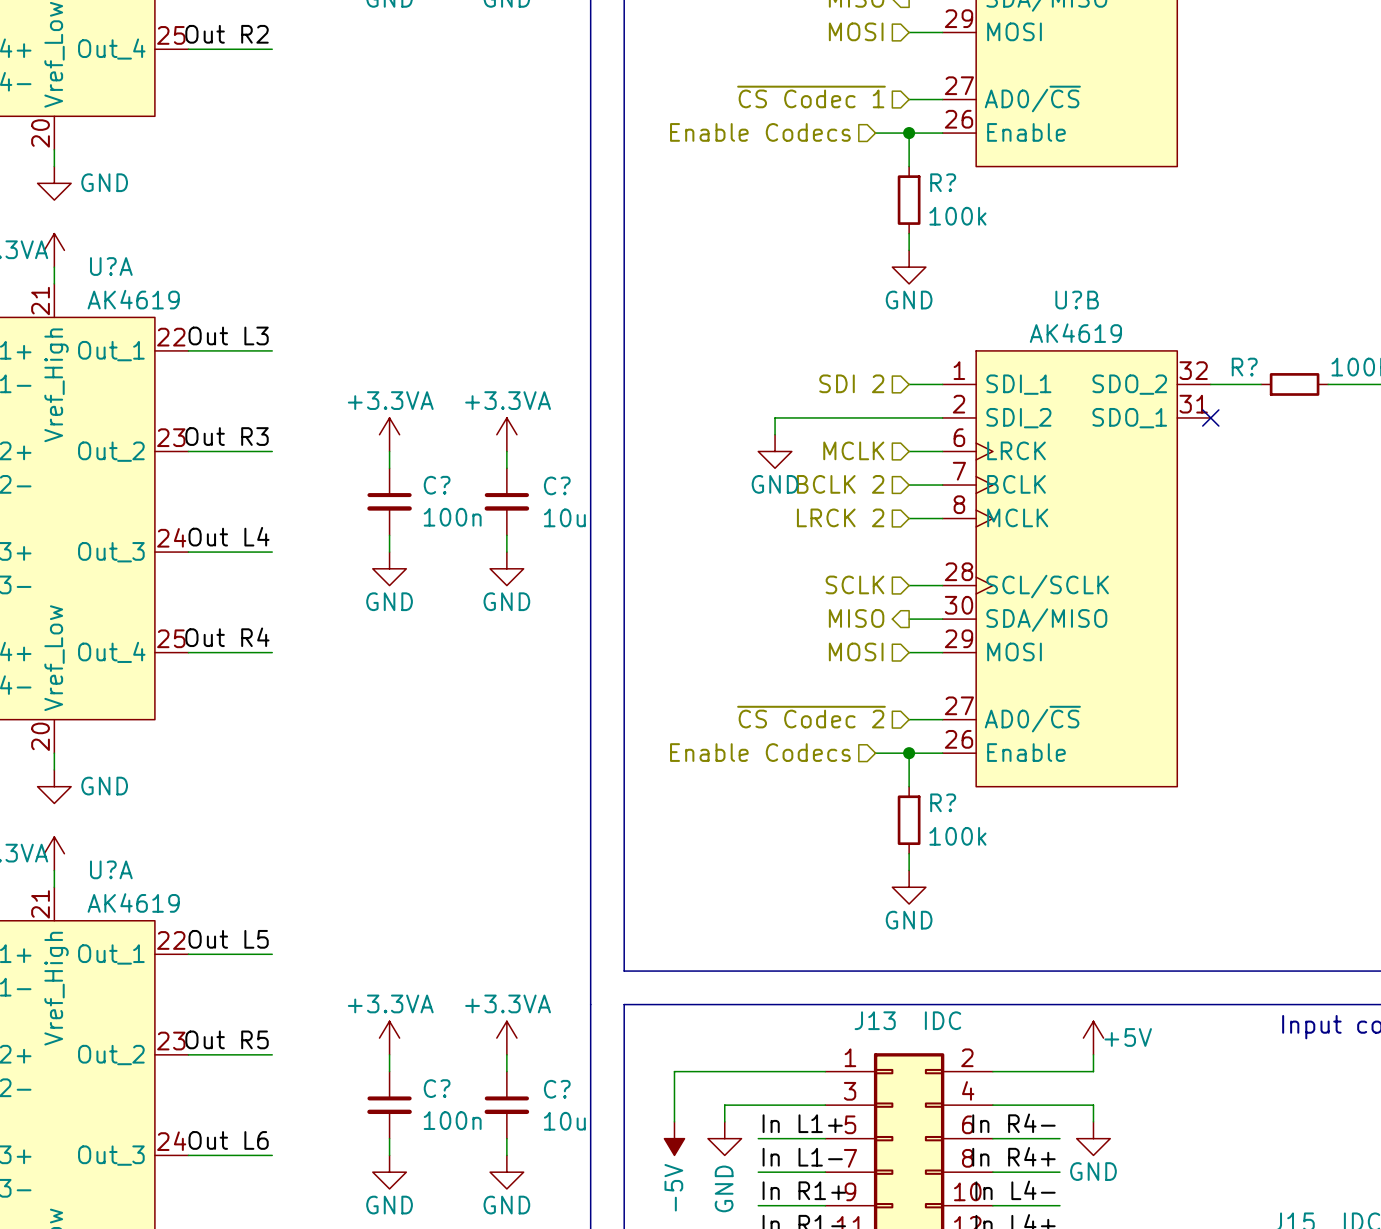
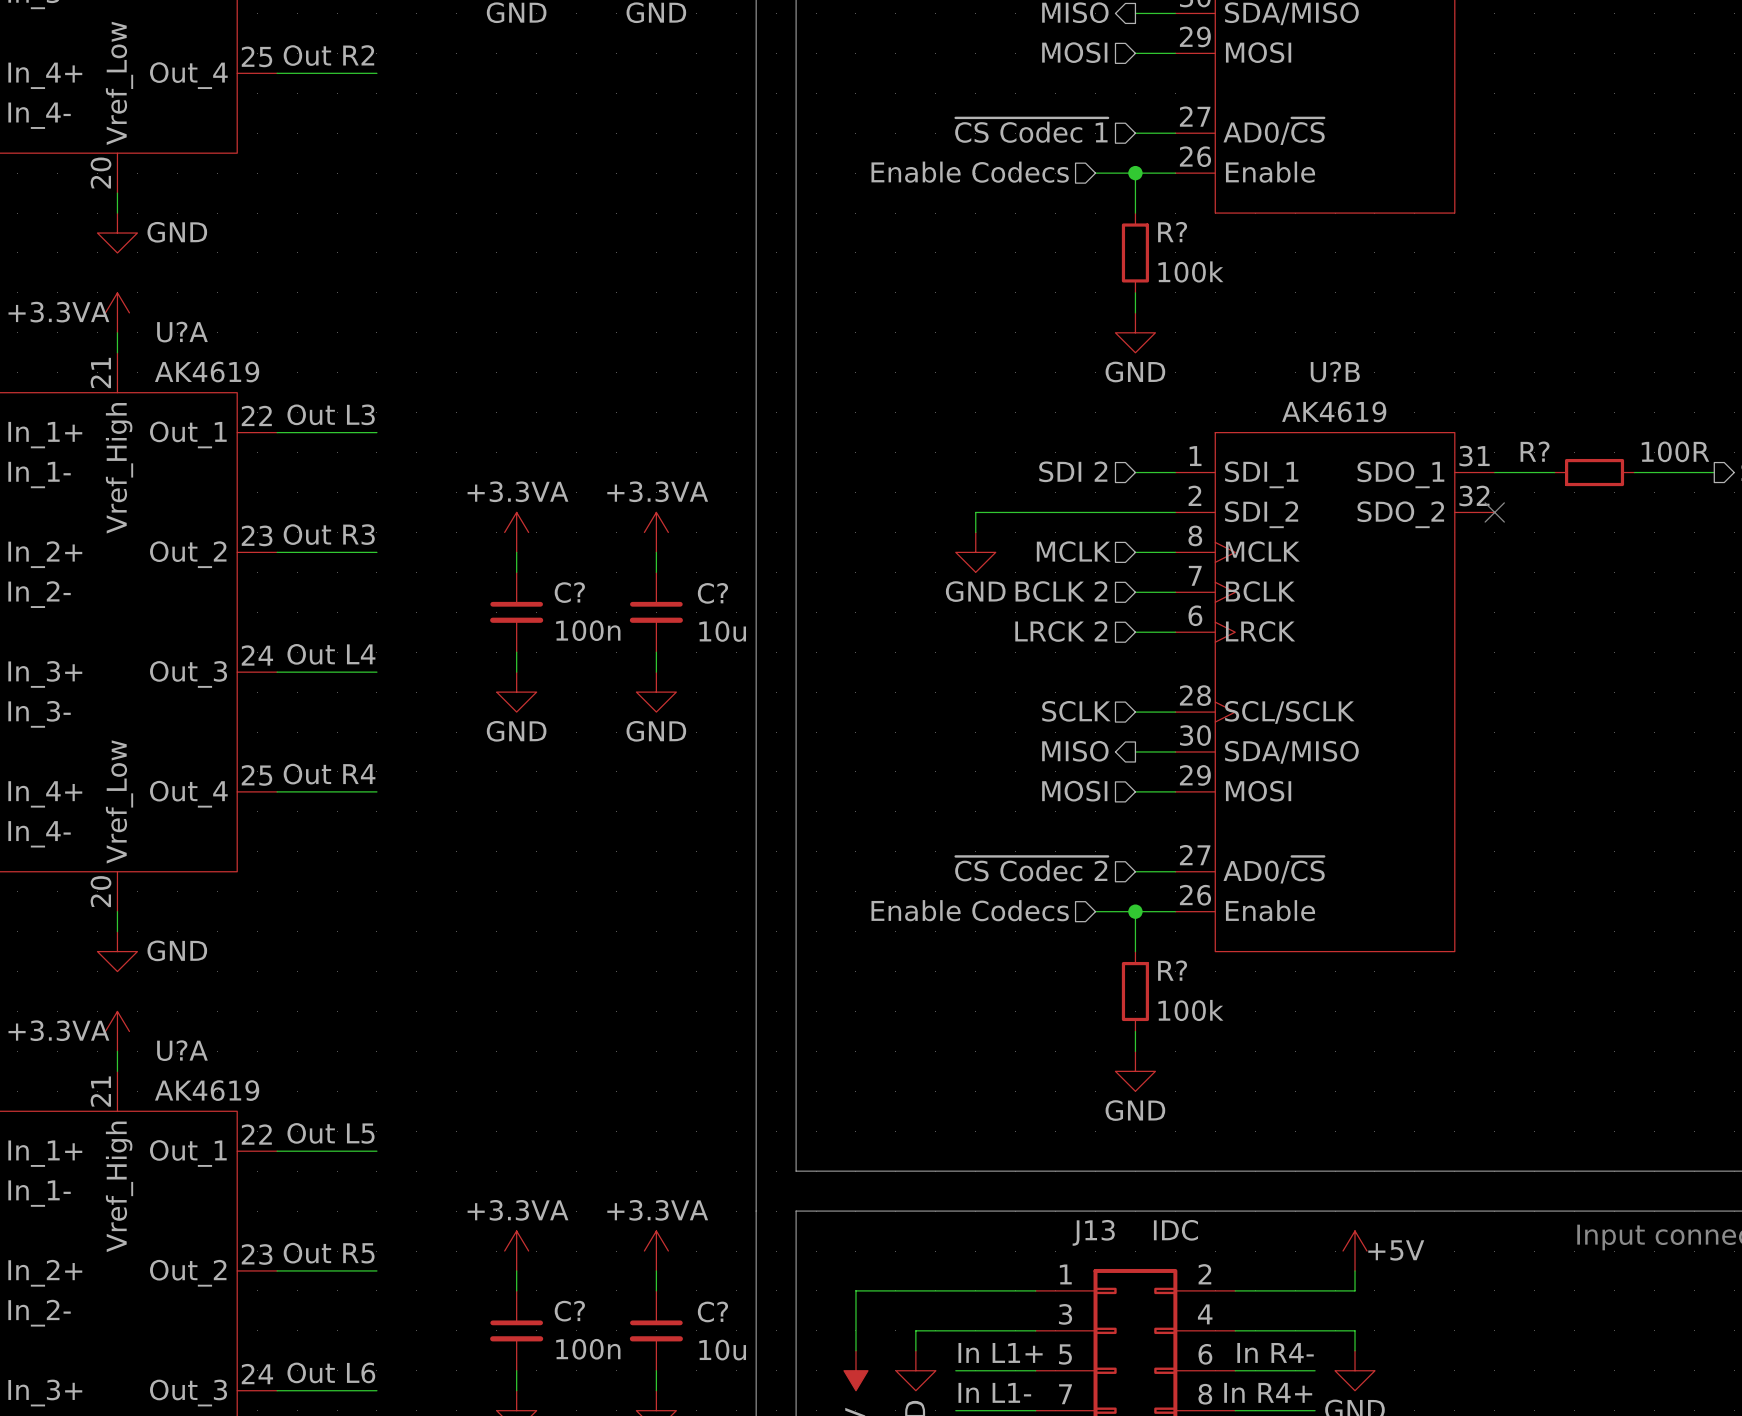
U?B pin number: 32 (1193, 370) -> 31 (1474, 456)
U?B pin name: SDO_2 (1129, 384) -> SDO_1 (1400, 474)
U?B pin number: 31 (1193, 404) -> 32 (1474, 496)
U?B pin name: SDO_1 (1129, 418) -> SDO_2 (1400, 514)
U?B pin number: 6 (959, 437) -> 8 (1195, 535)
U?B pin name: LRCK (1016, 450) -> MCLK (1262, 551)
U?B pin number: 8 (959, 504) -> 6 (1195, 615)
U?B pin name: MCLK (1017, 517) -> LRCK (1260, 631)

